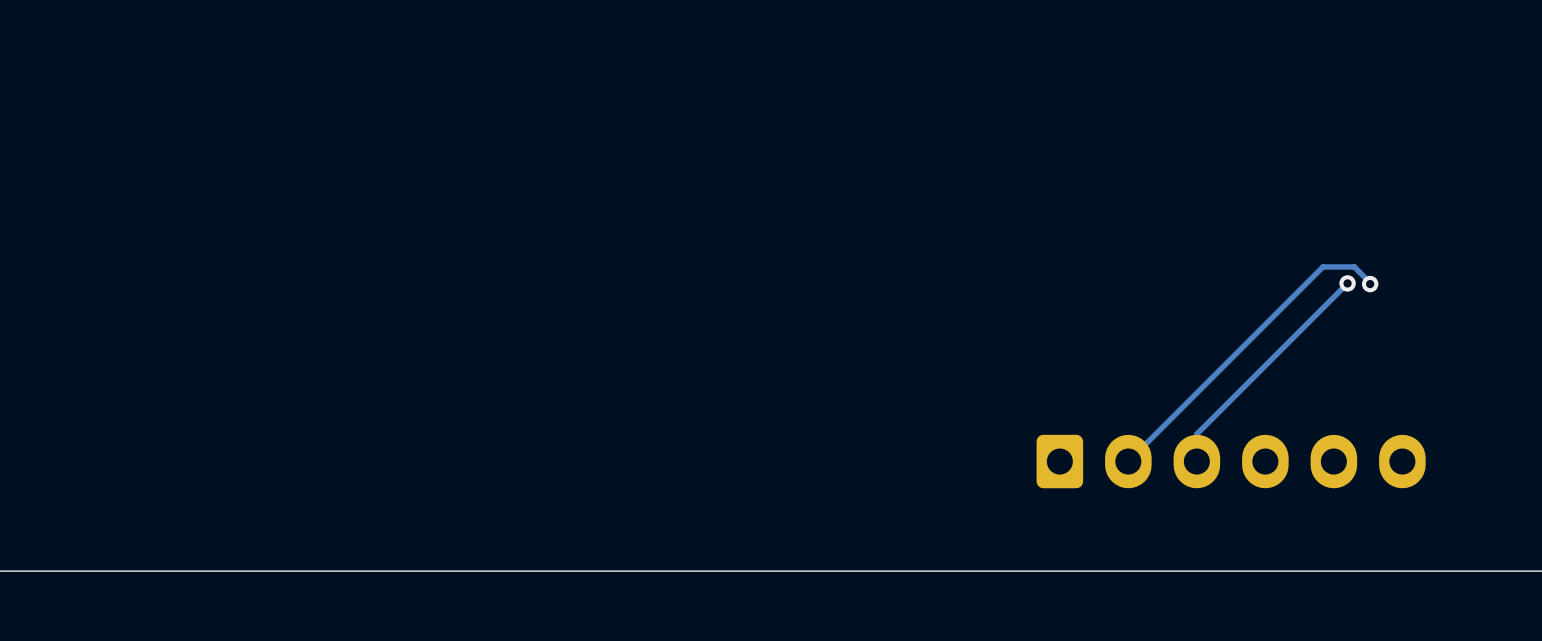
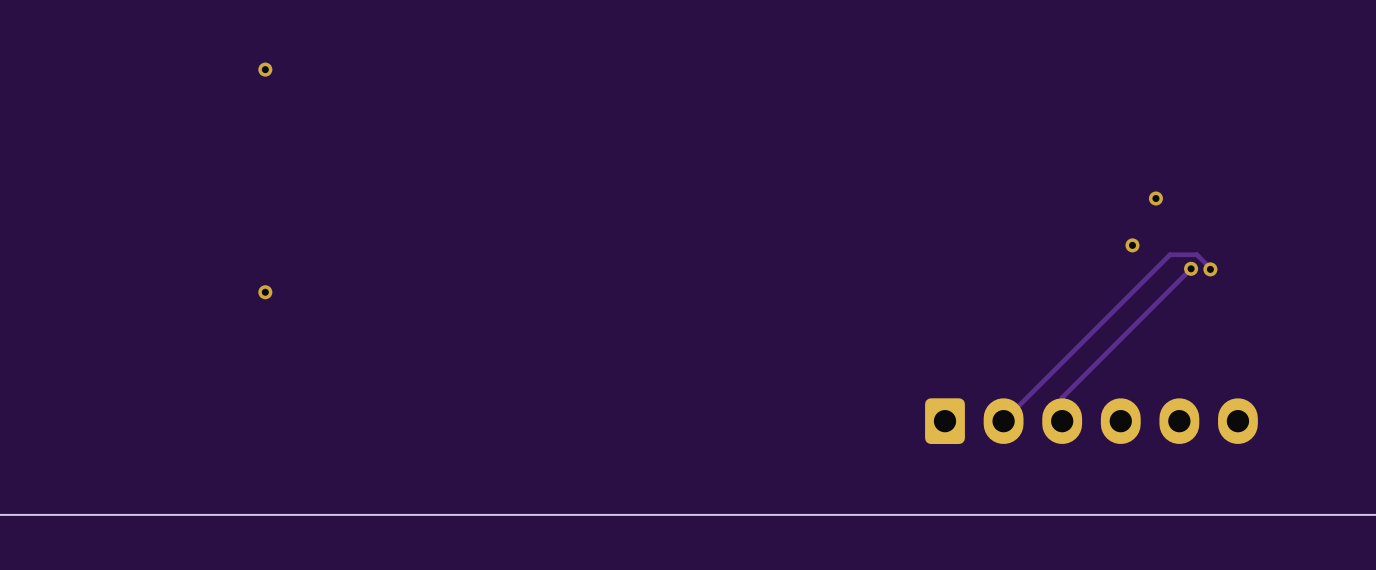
via: none -> (265, 69)
via: none -> (1155, 198)
via: none -> (1132, 245)
via: none -> (265, 292)

